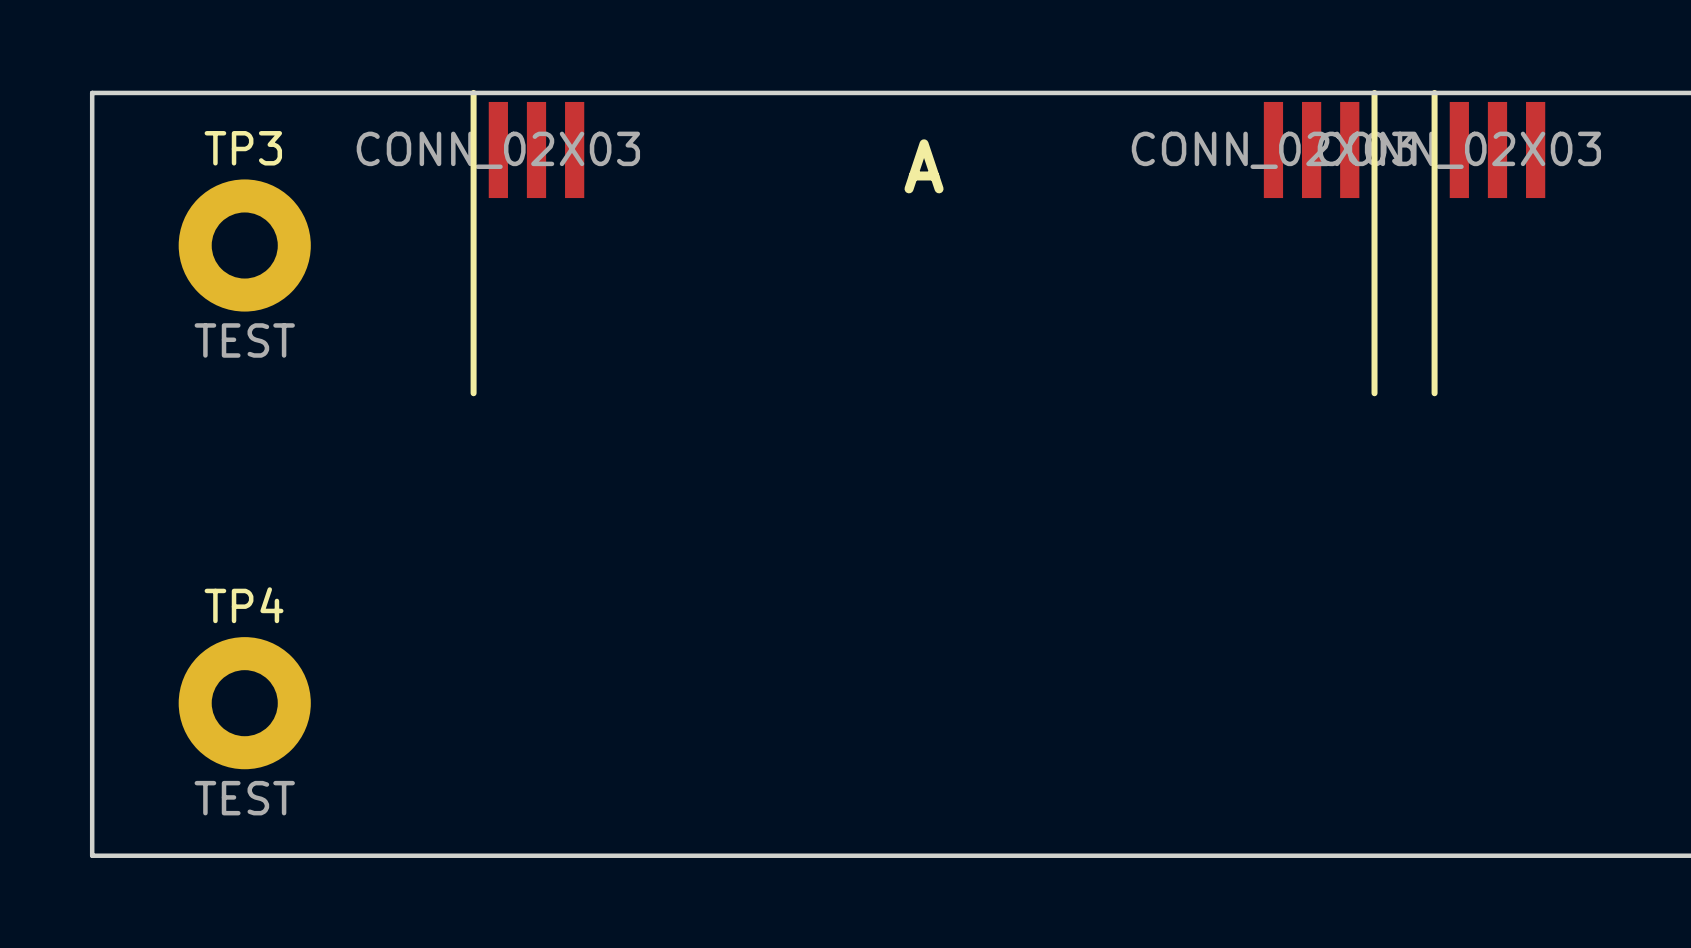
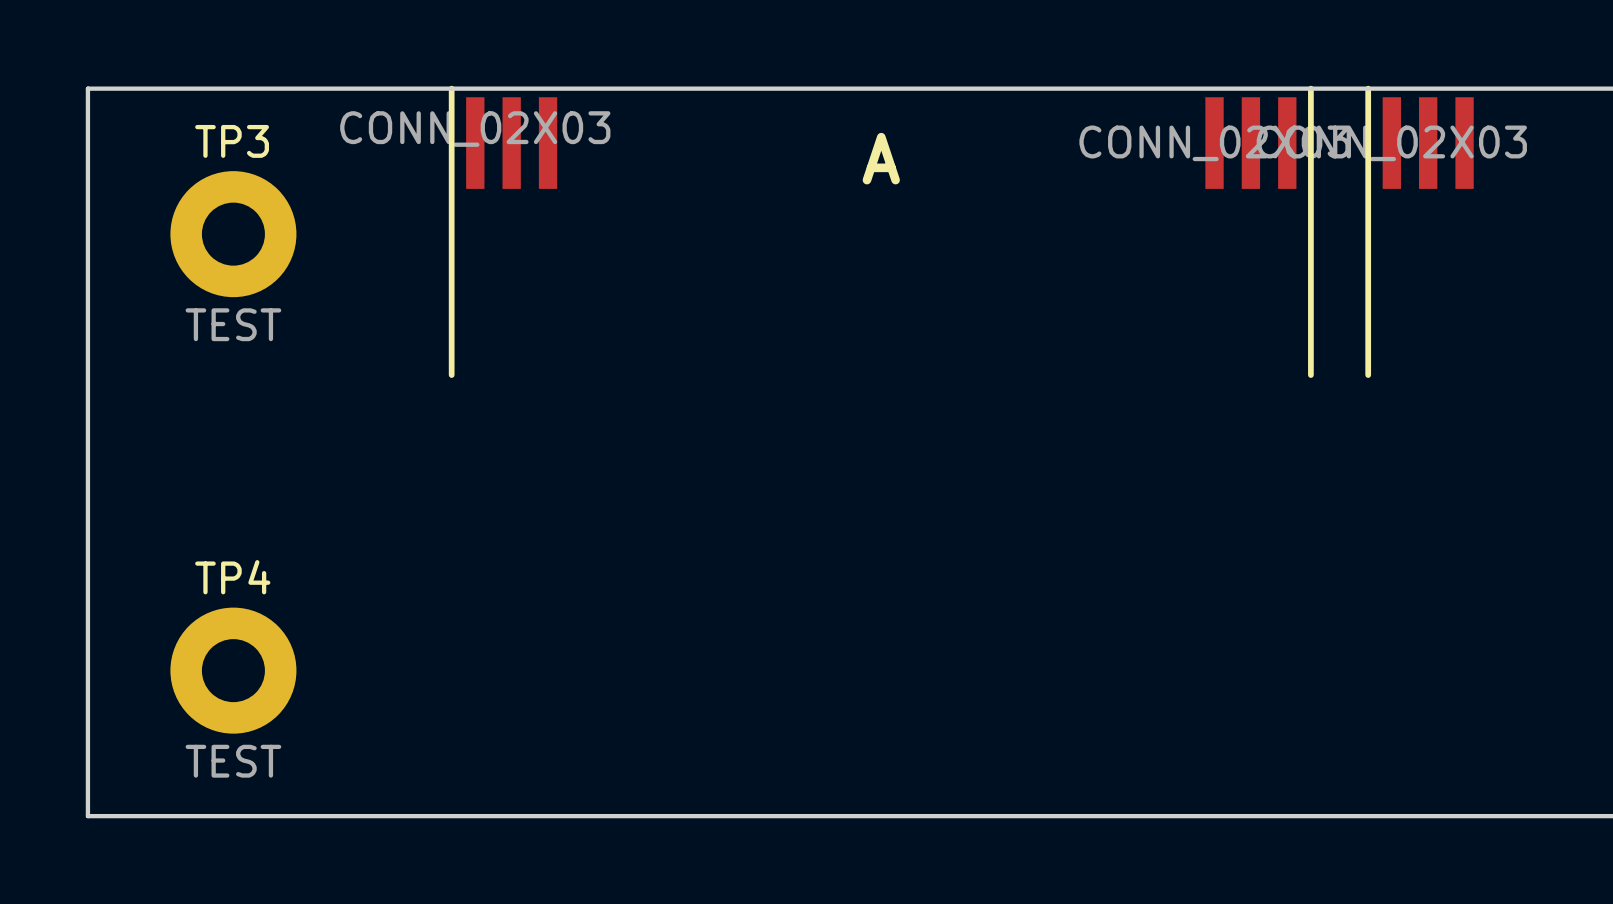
part value position: CONN_02X03 (498, 150) -> CONN_02X03 (475, 129)

